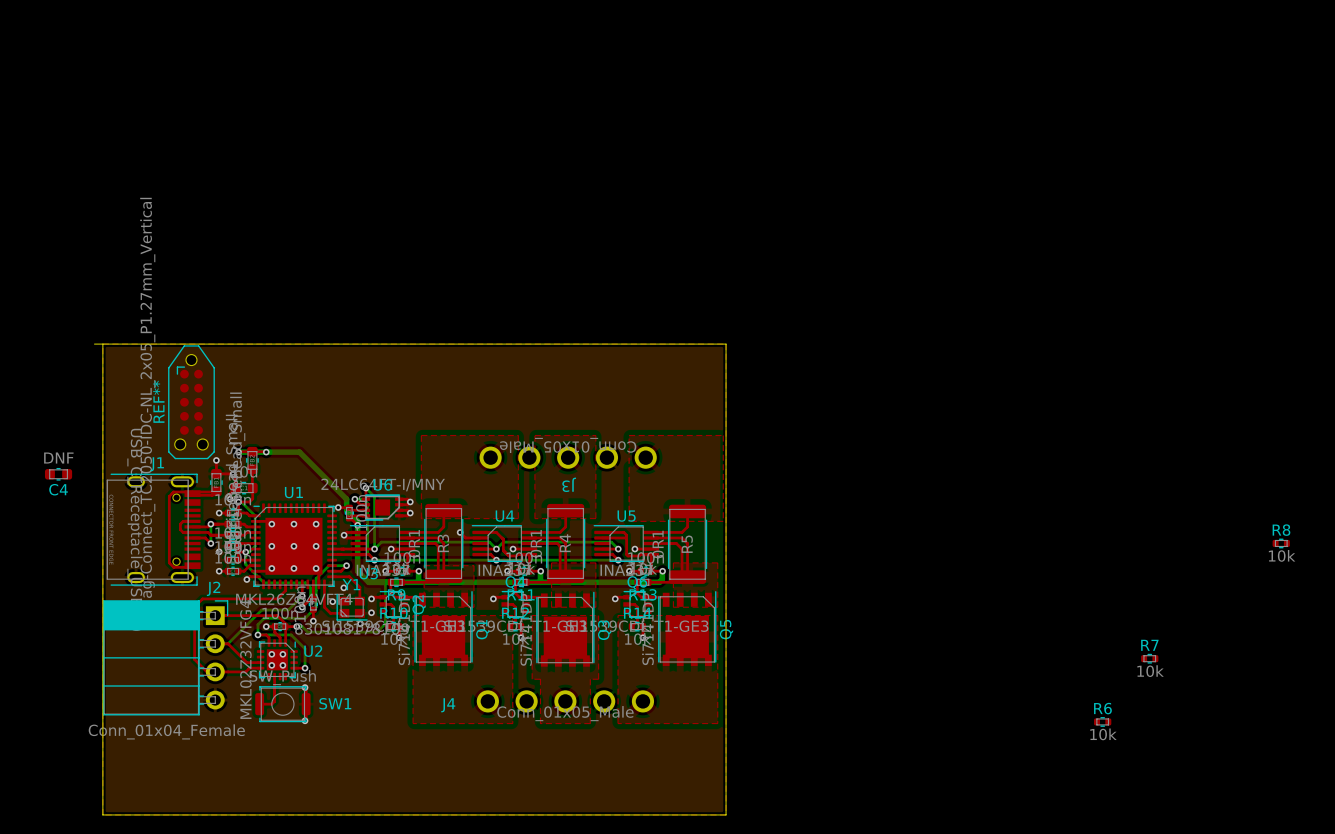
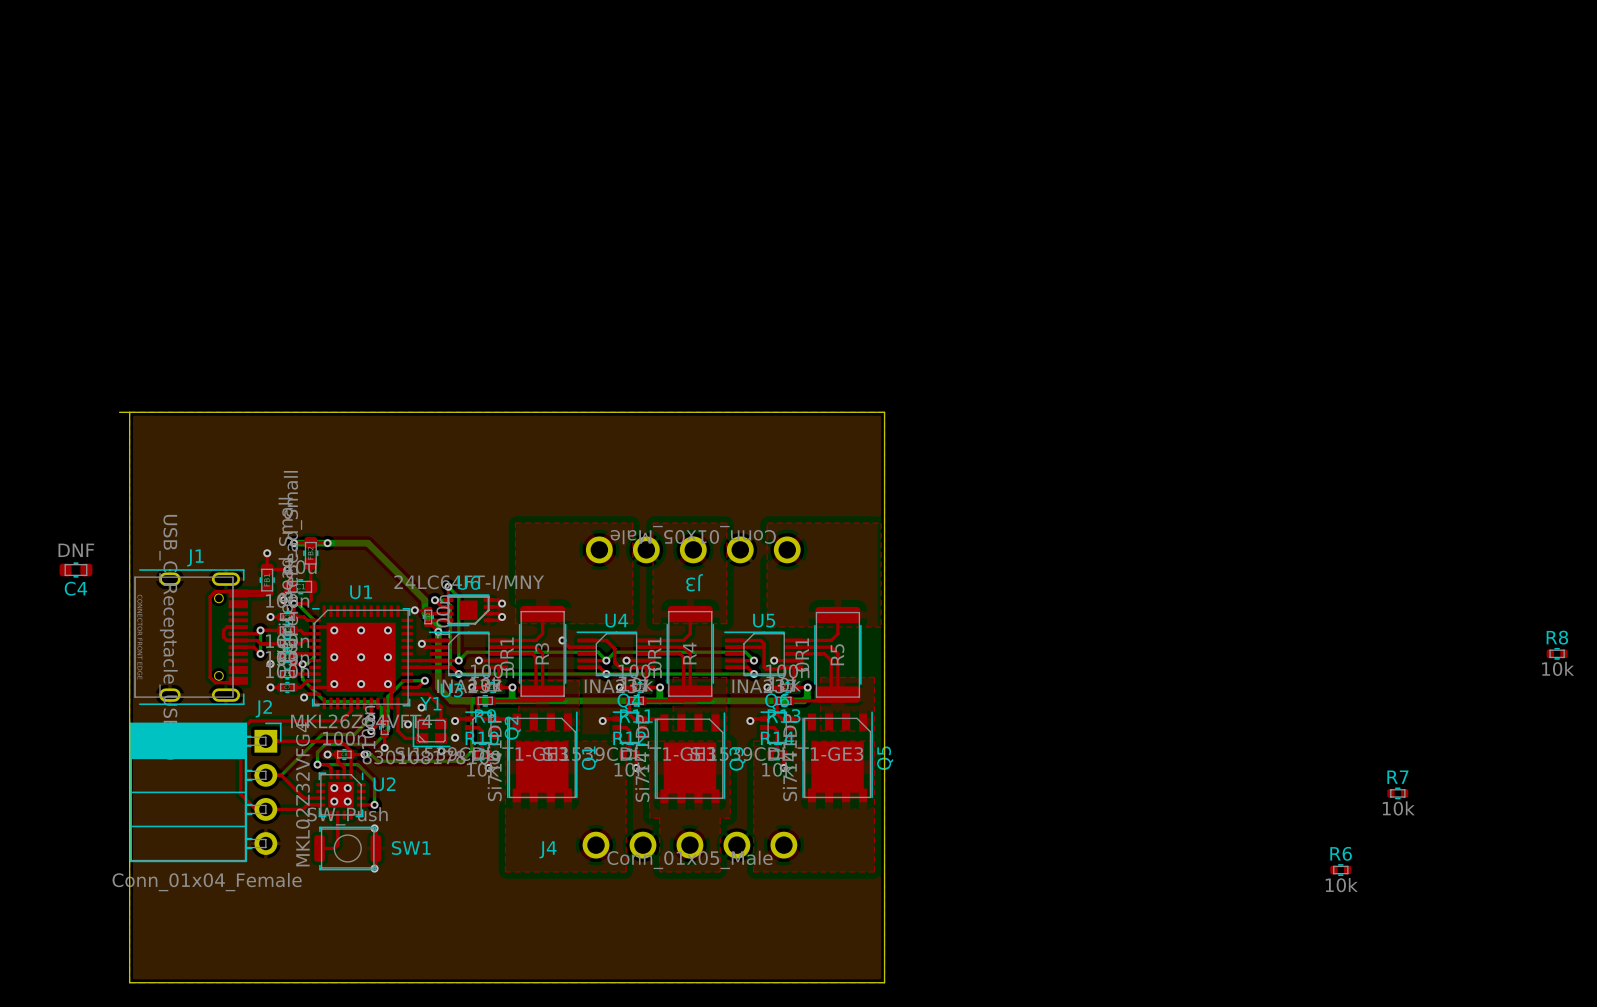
REF**: Tag-Connect_TC2050-IDC-NL_2x05_P1.27mm_Vertical (191, 402) -> none

